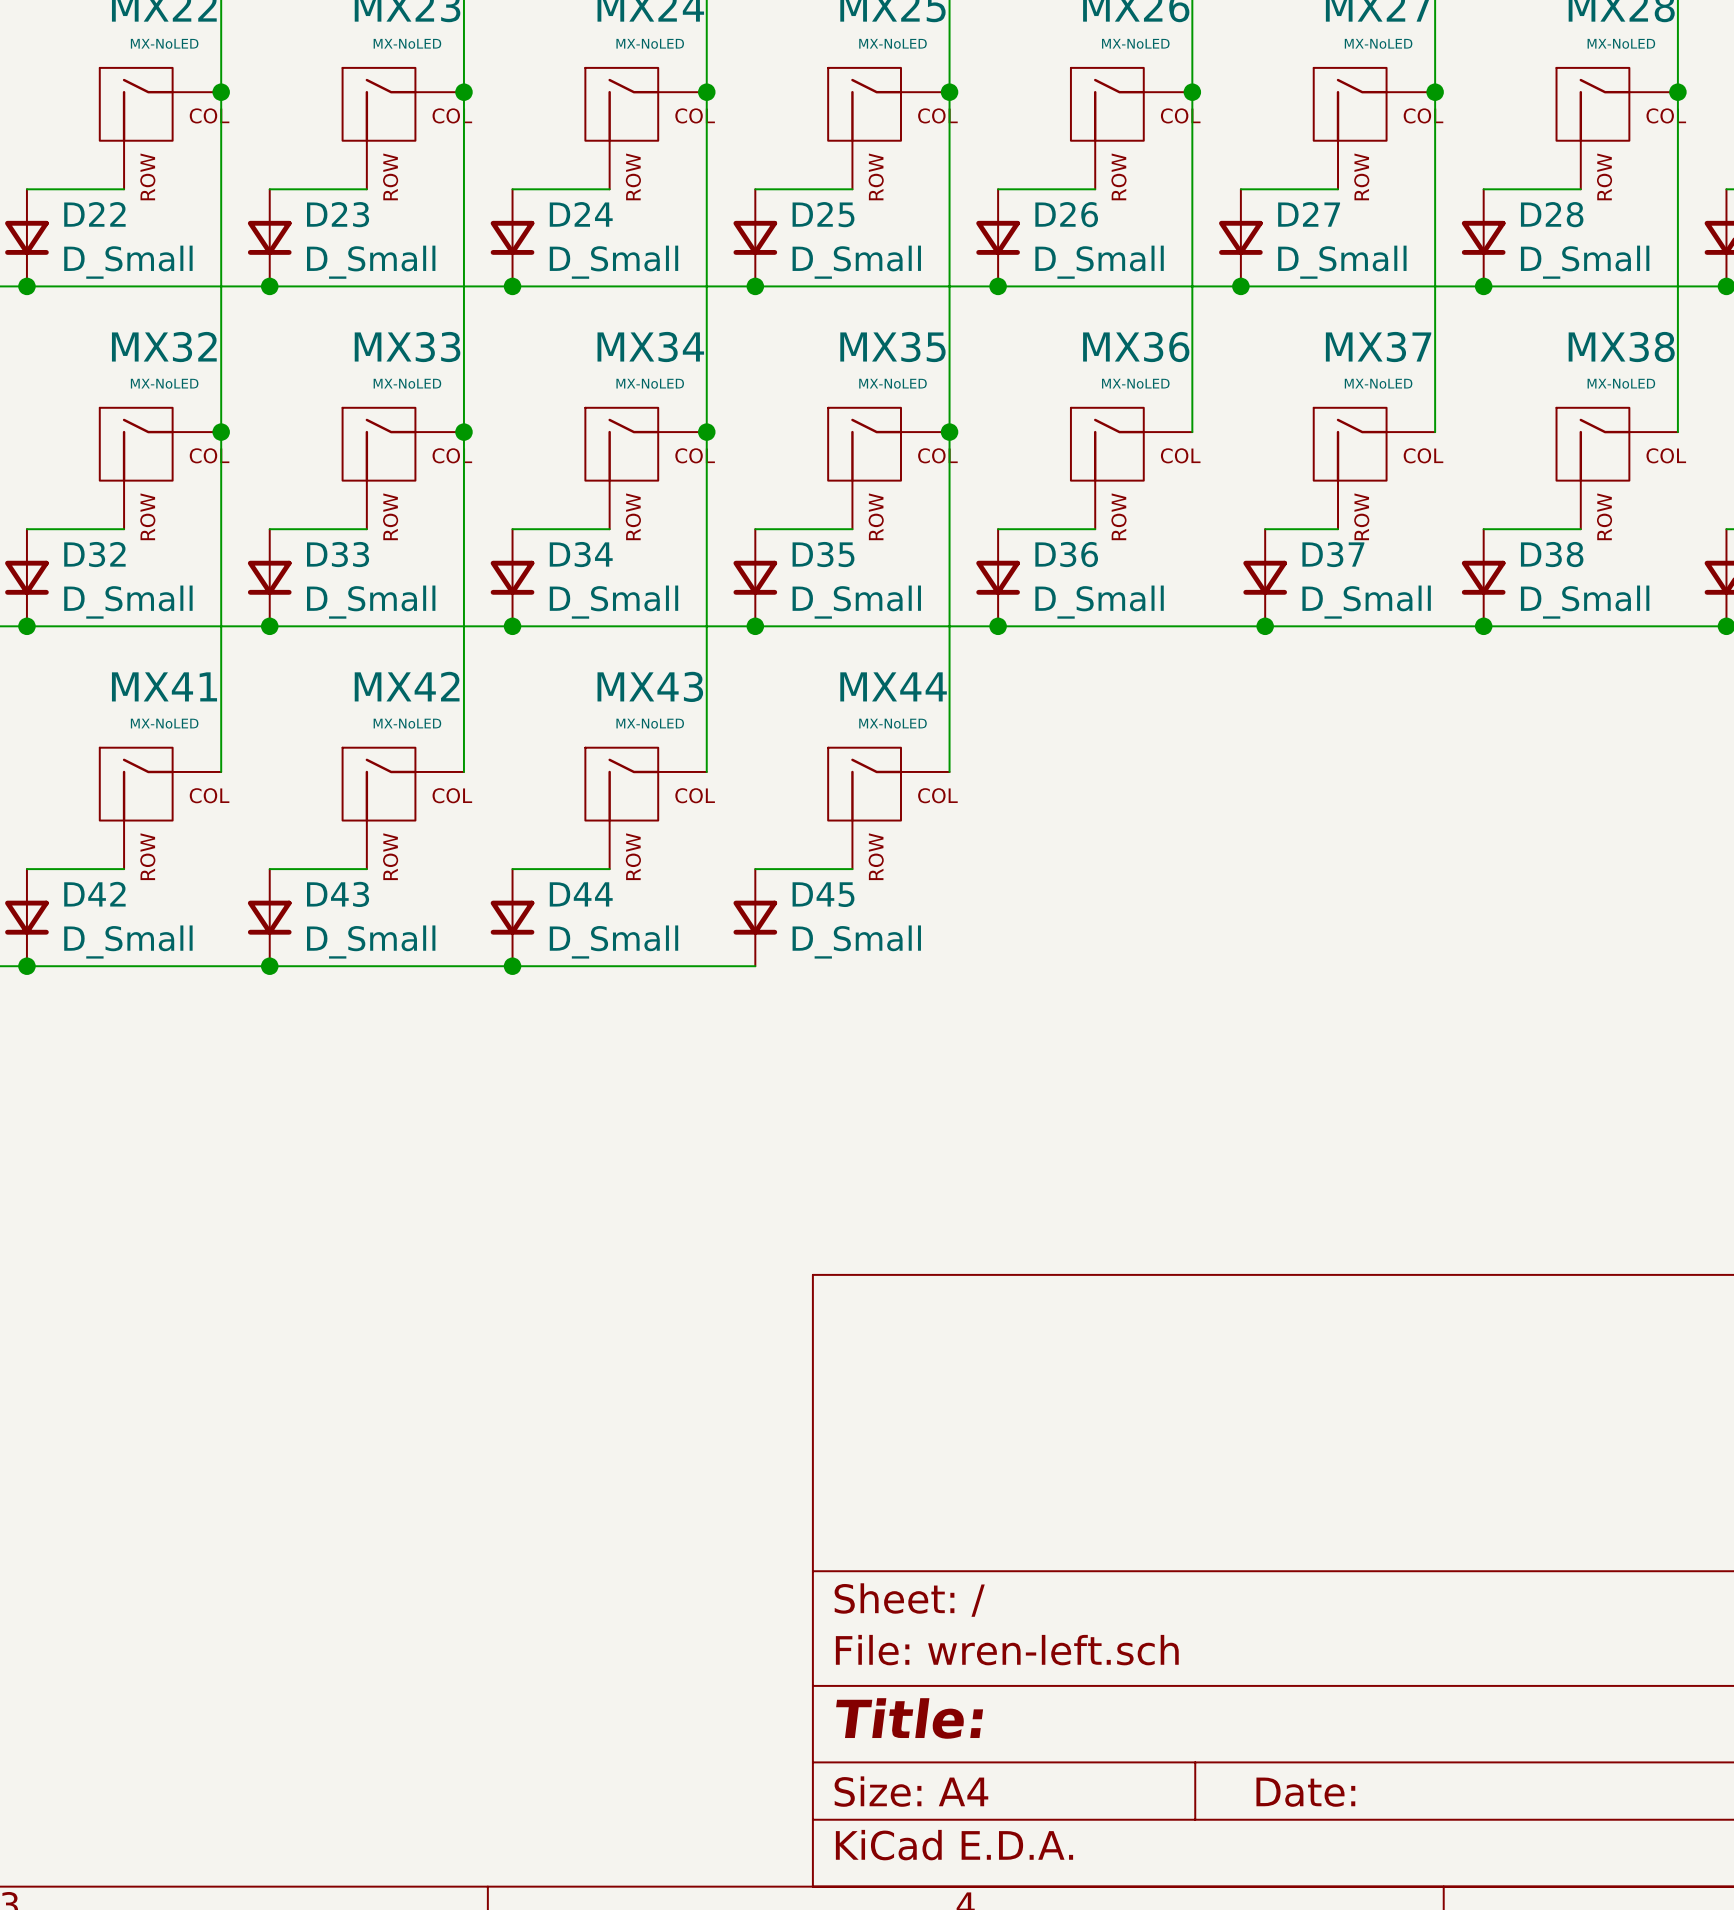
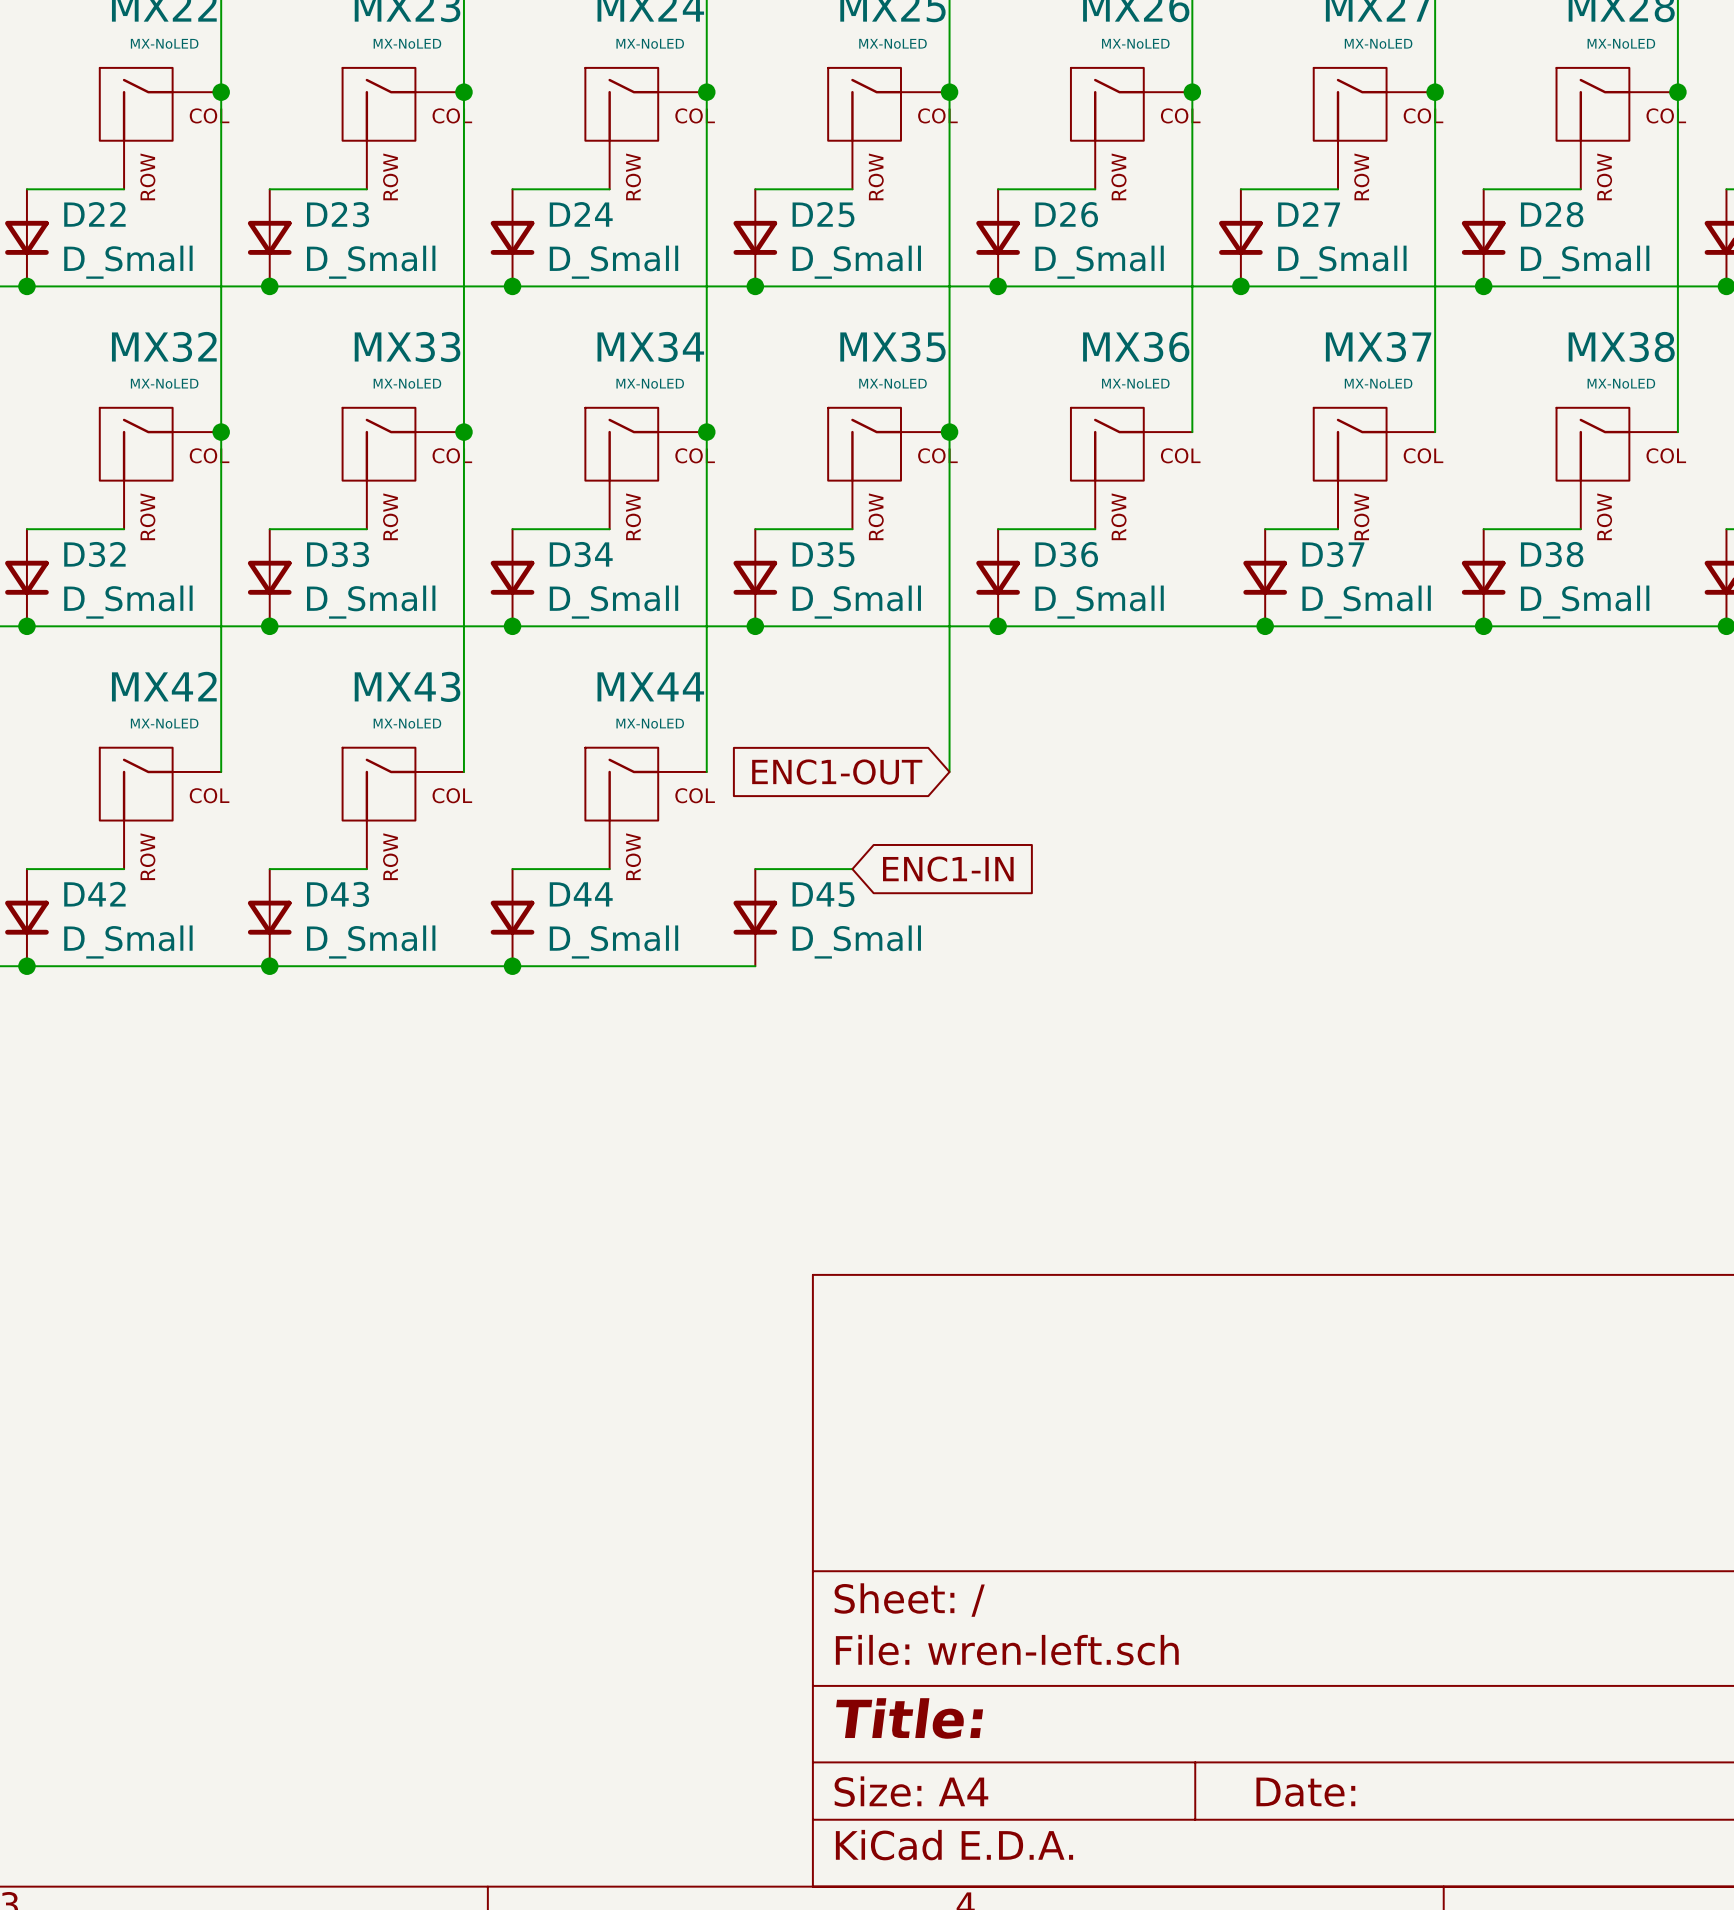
MX41 name: MX41 (164, 686) -> MX42 (164, 686)
MX42 name: MX42 (407, 686) -> MX43 (407, 686)
MX43 name: MX43 (650, 686) -> MX44 (650, 686)
global label: none -> ENC1-OUT (837, 772)
MX44: MX-NoLED (888, 808) -> none
global label: none -> ENC1-IN (948, 869)

